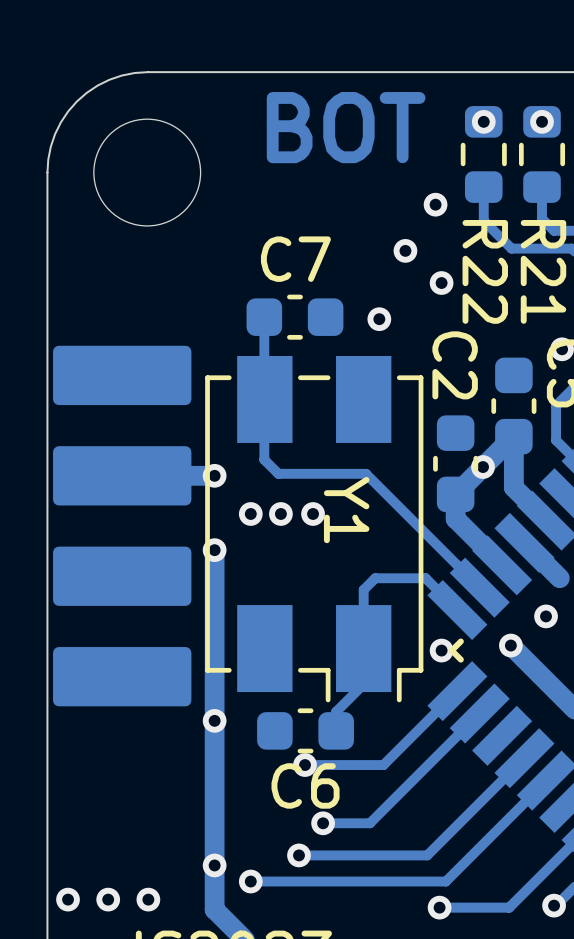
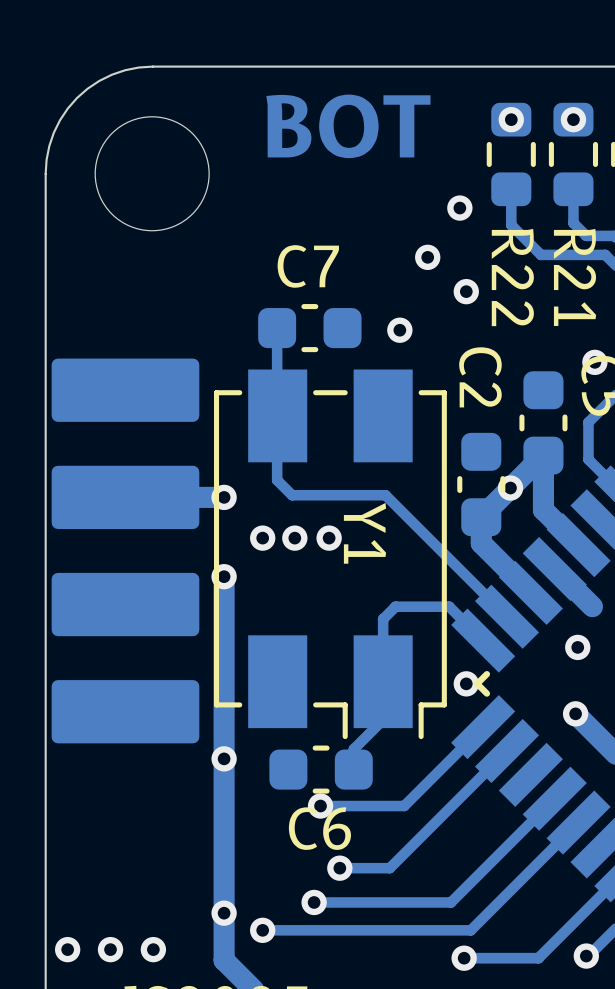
track: (510, 645) (544, 678) -> none
via position: (510, 645) -> (575, 713)

